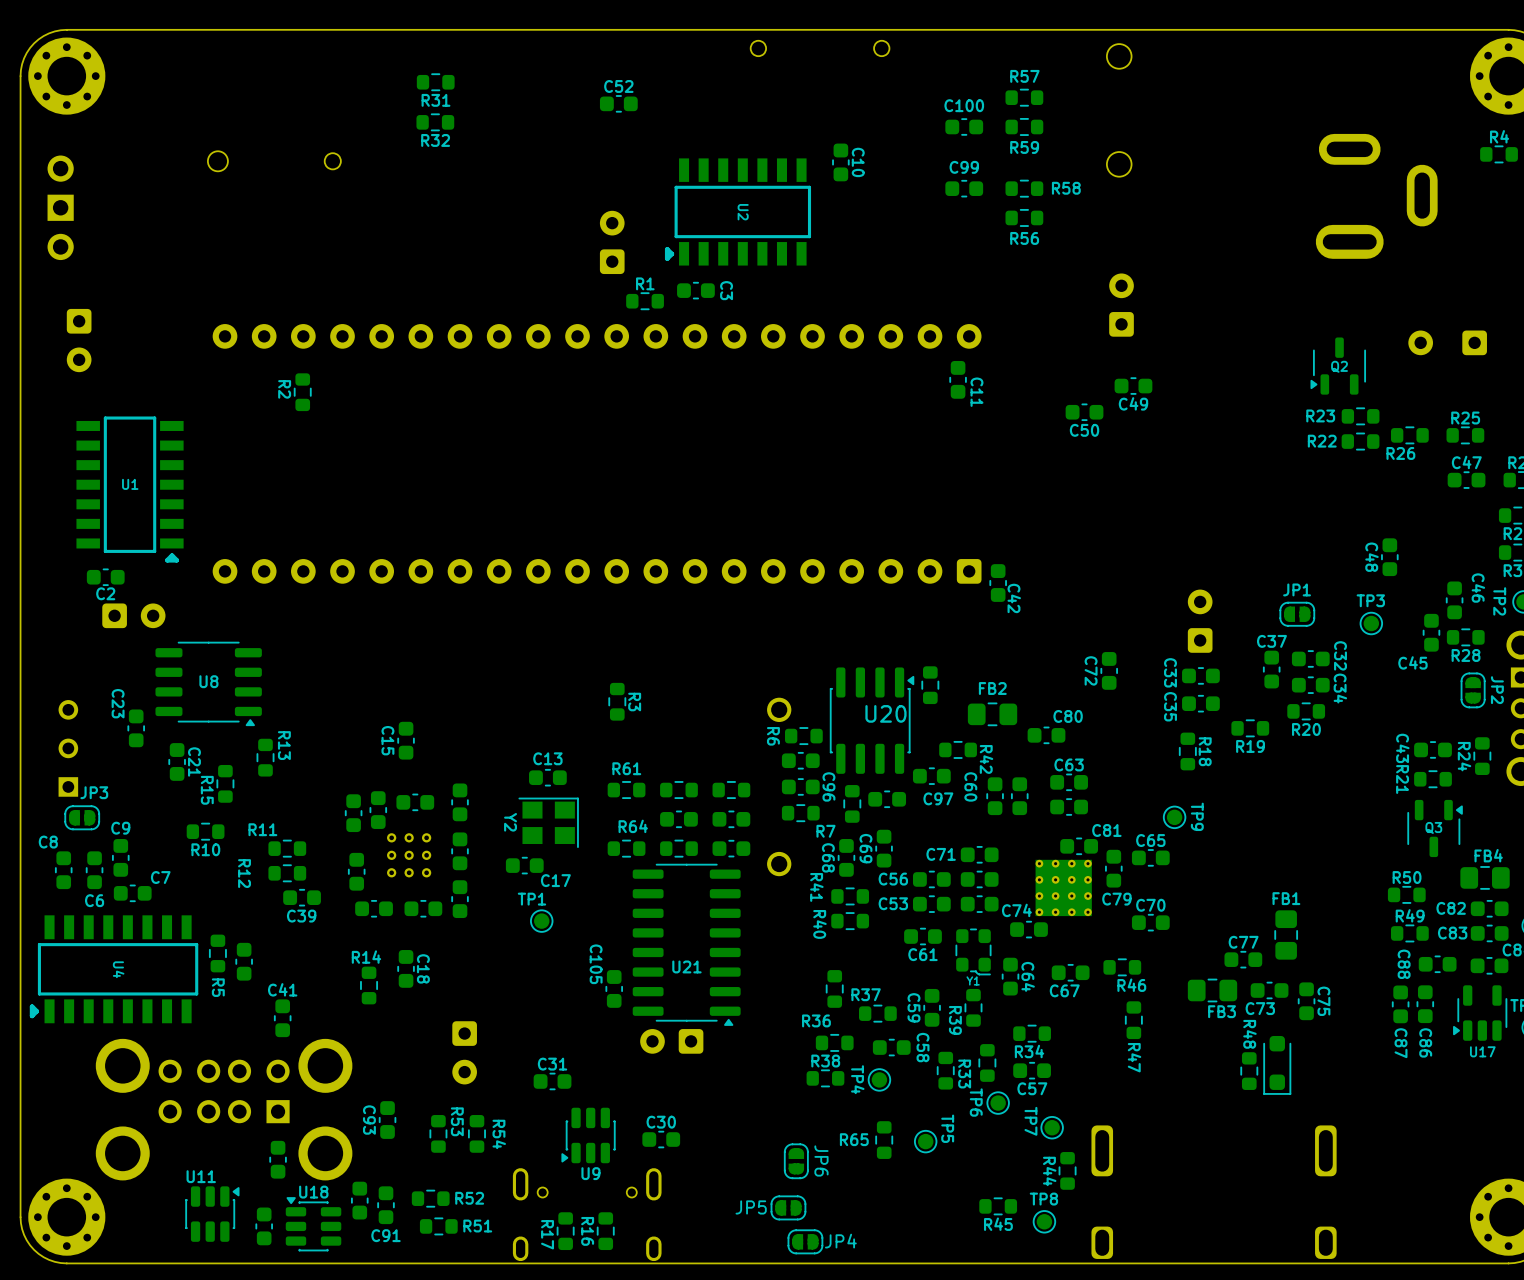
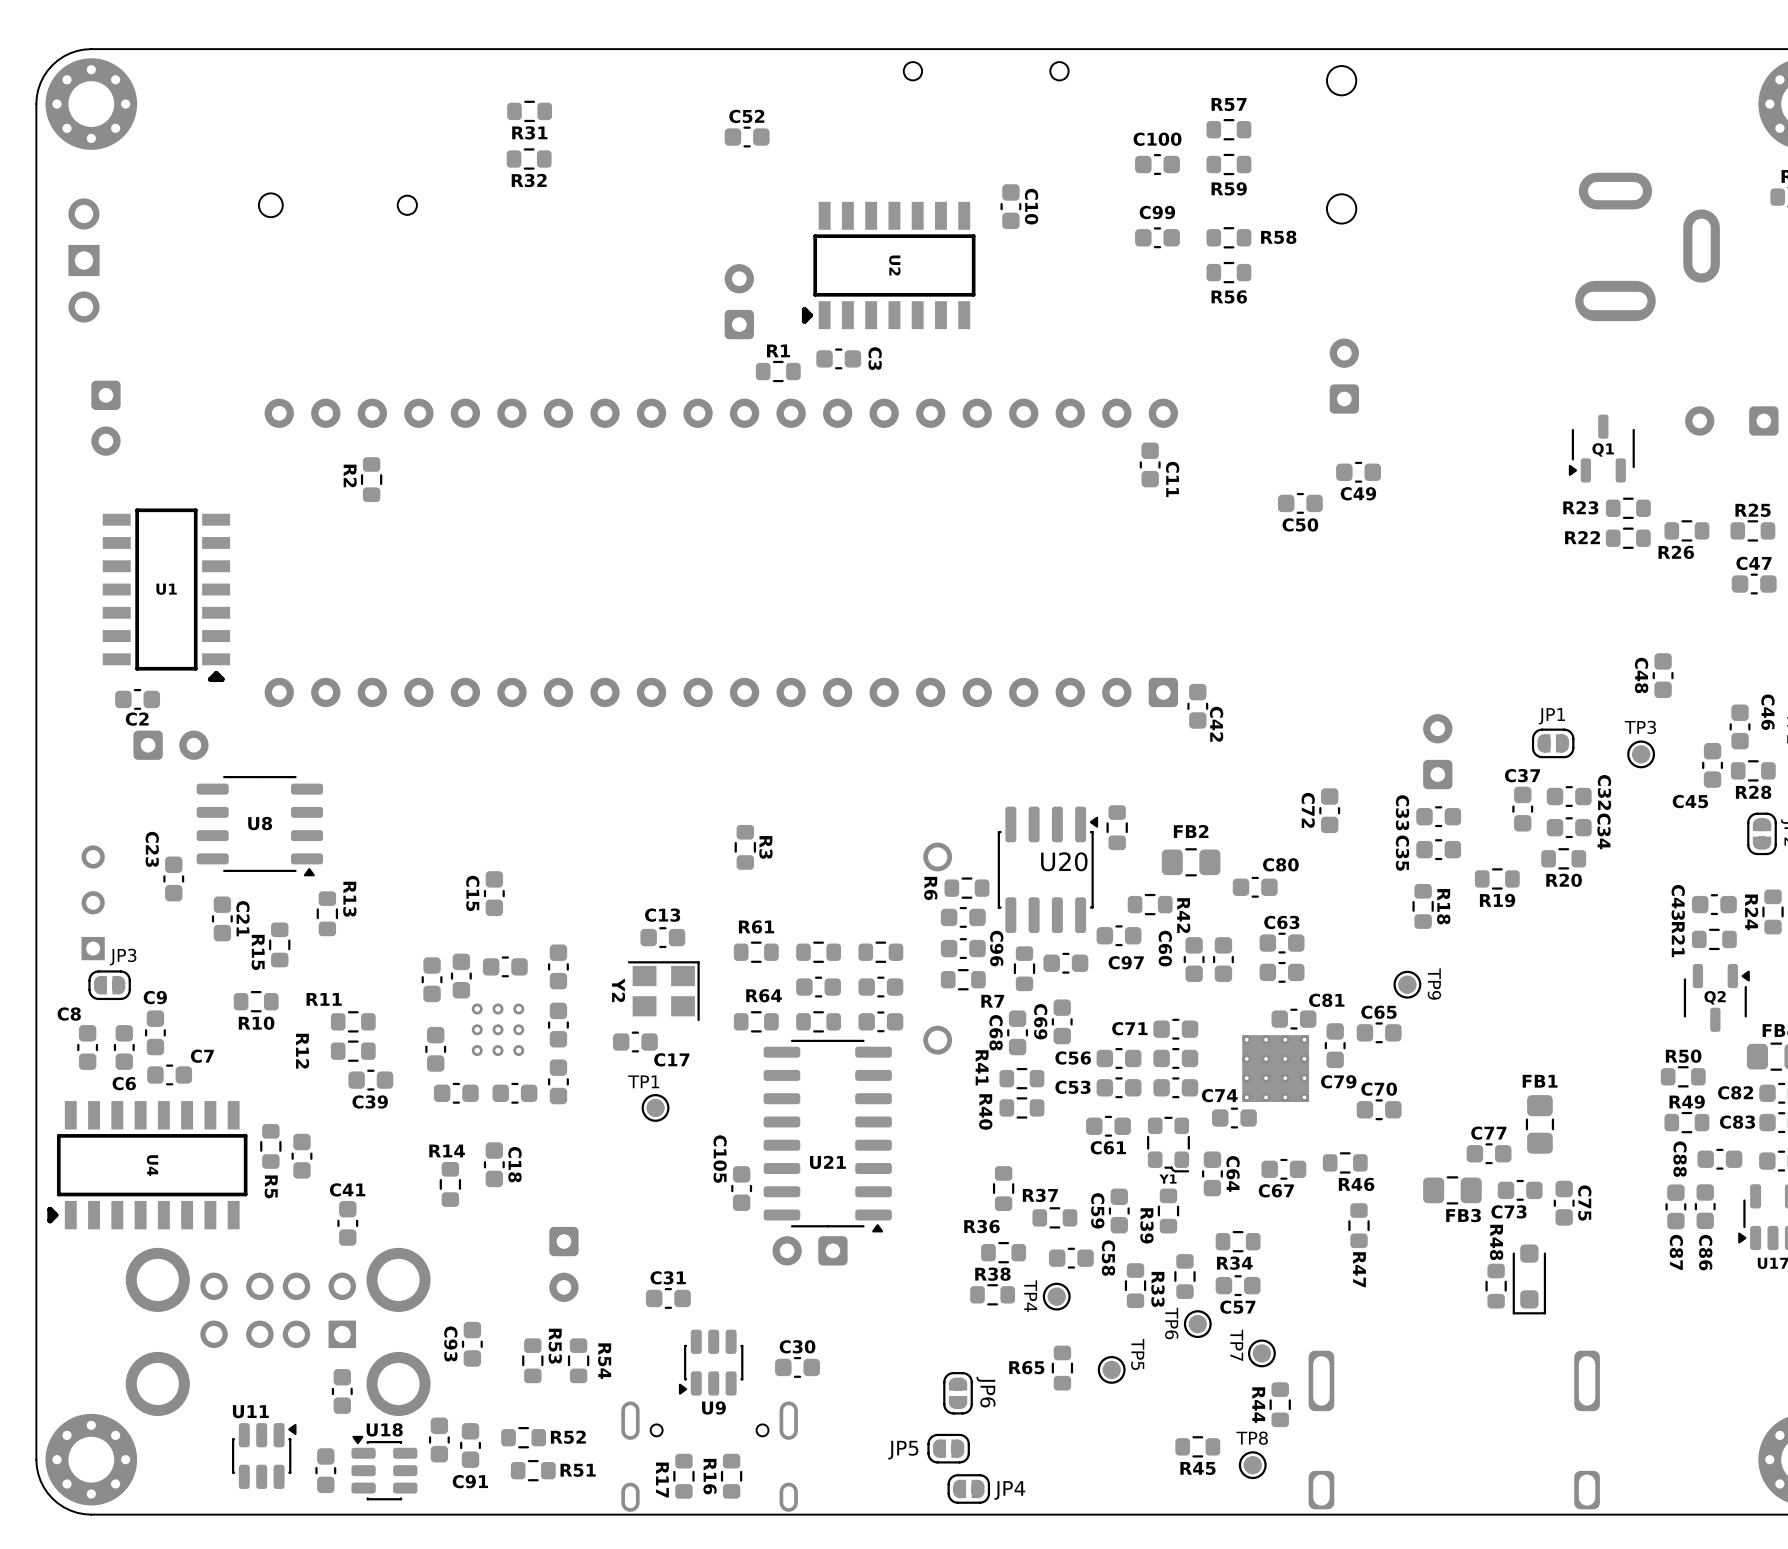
Q2 name: Q2 (1339, 366) -> Q1 (1603, 449)
Q3 name: Q3 (1433, 827) -> Q2 (1715, 997)

